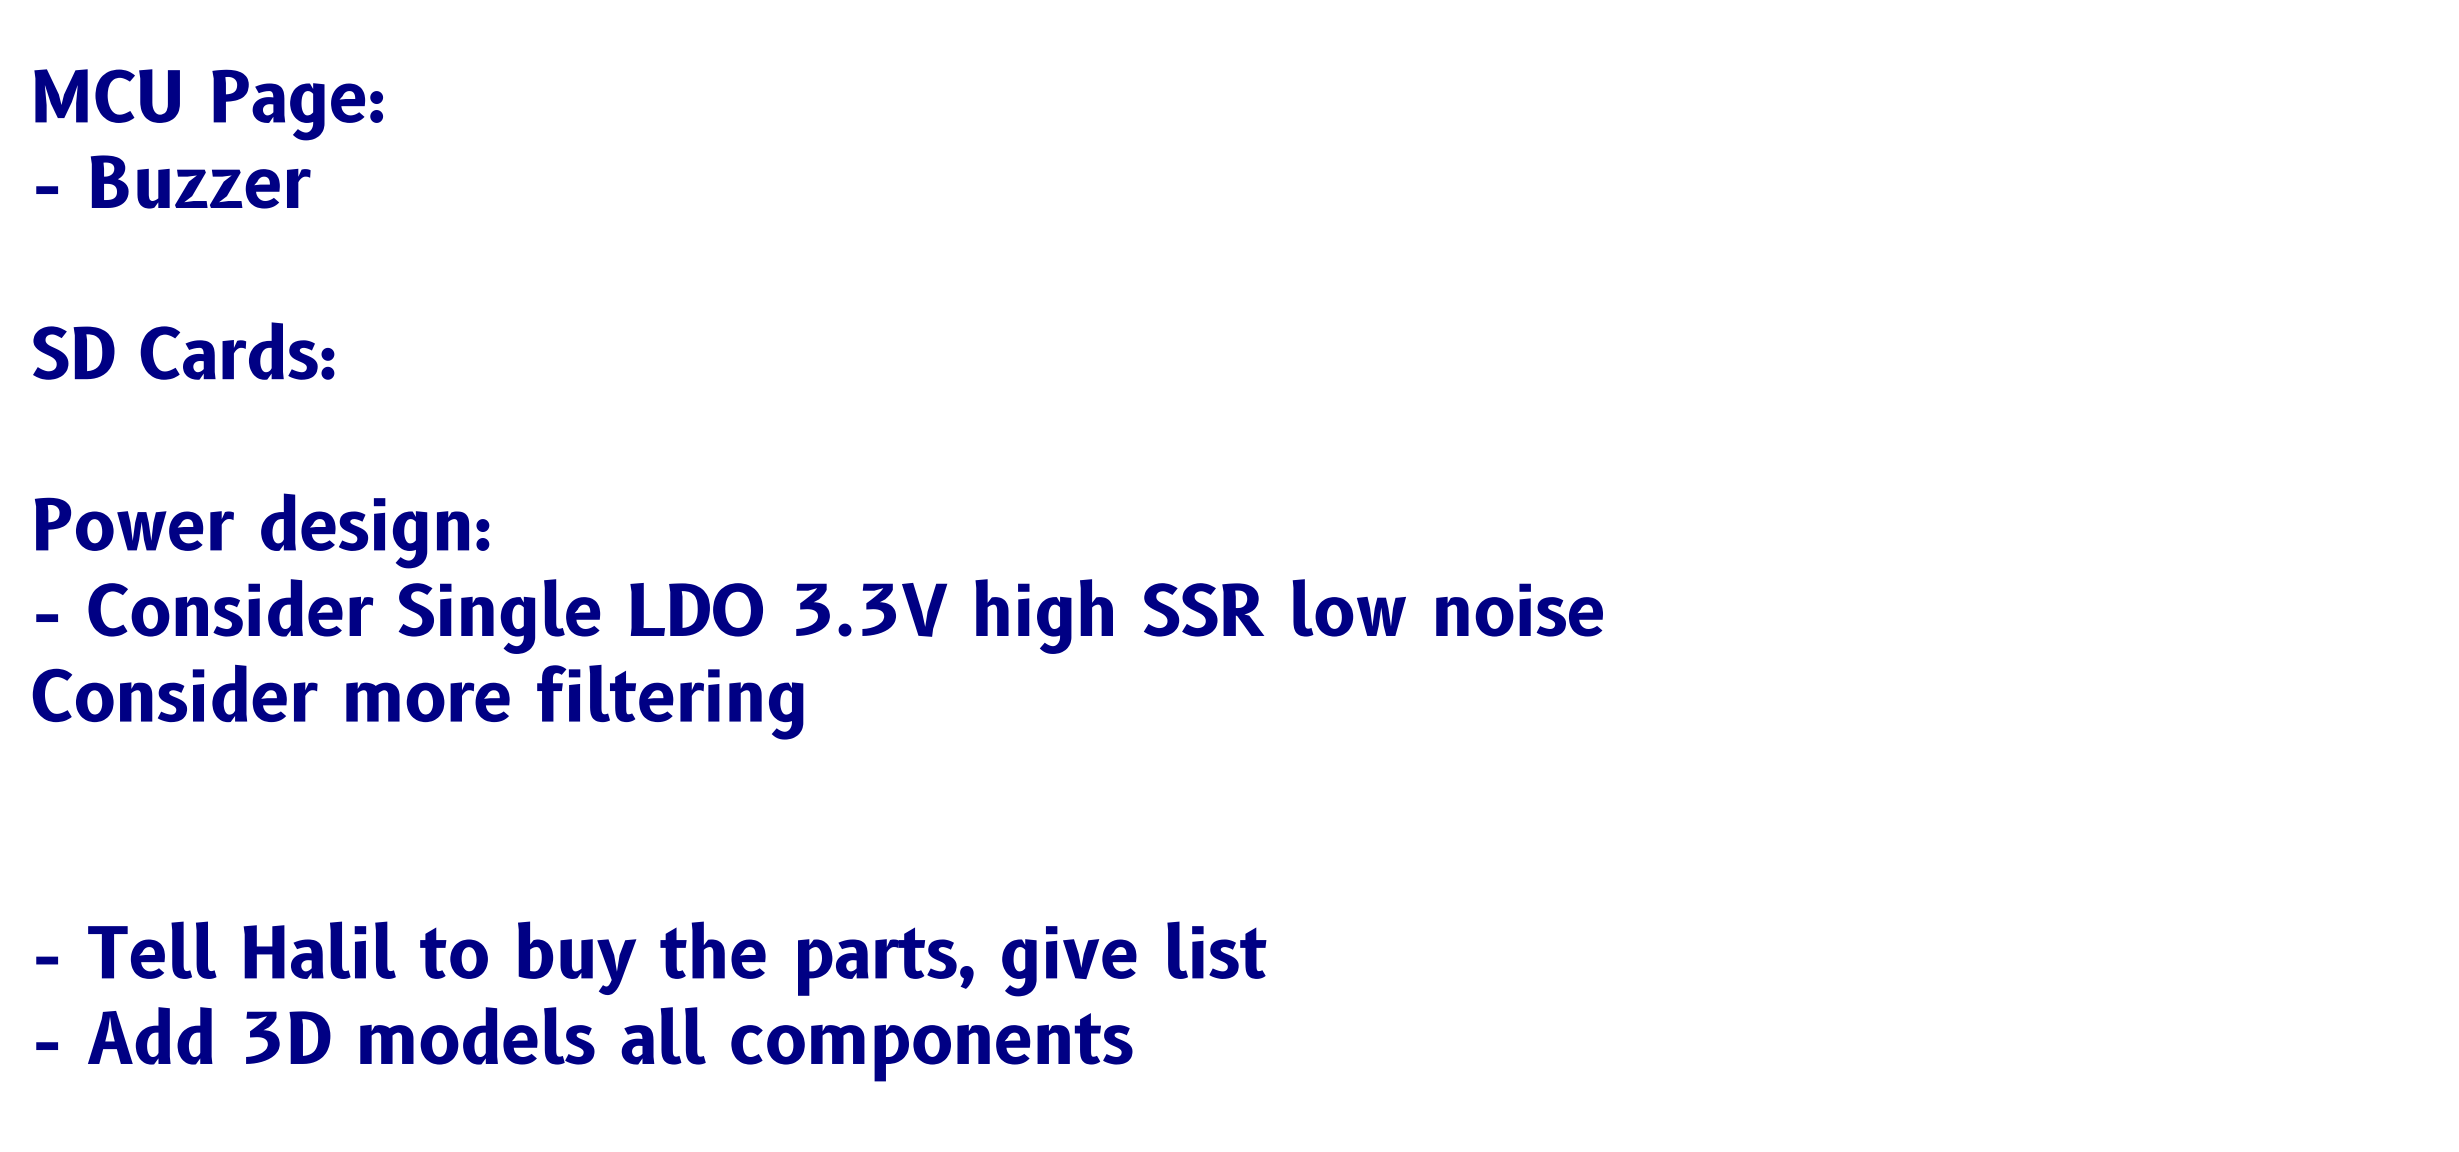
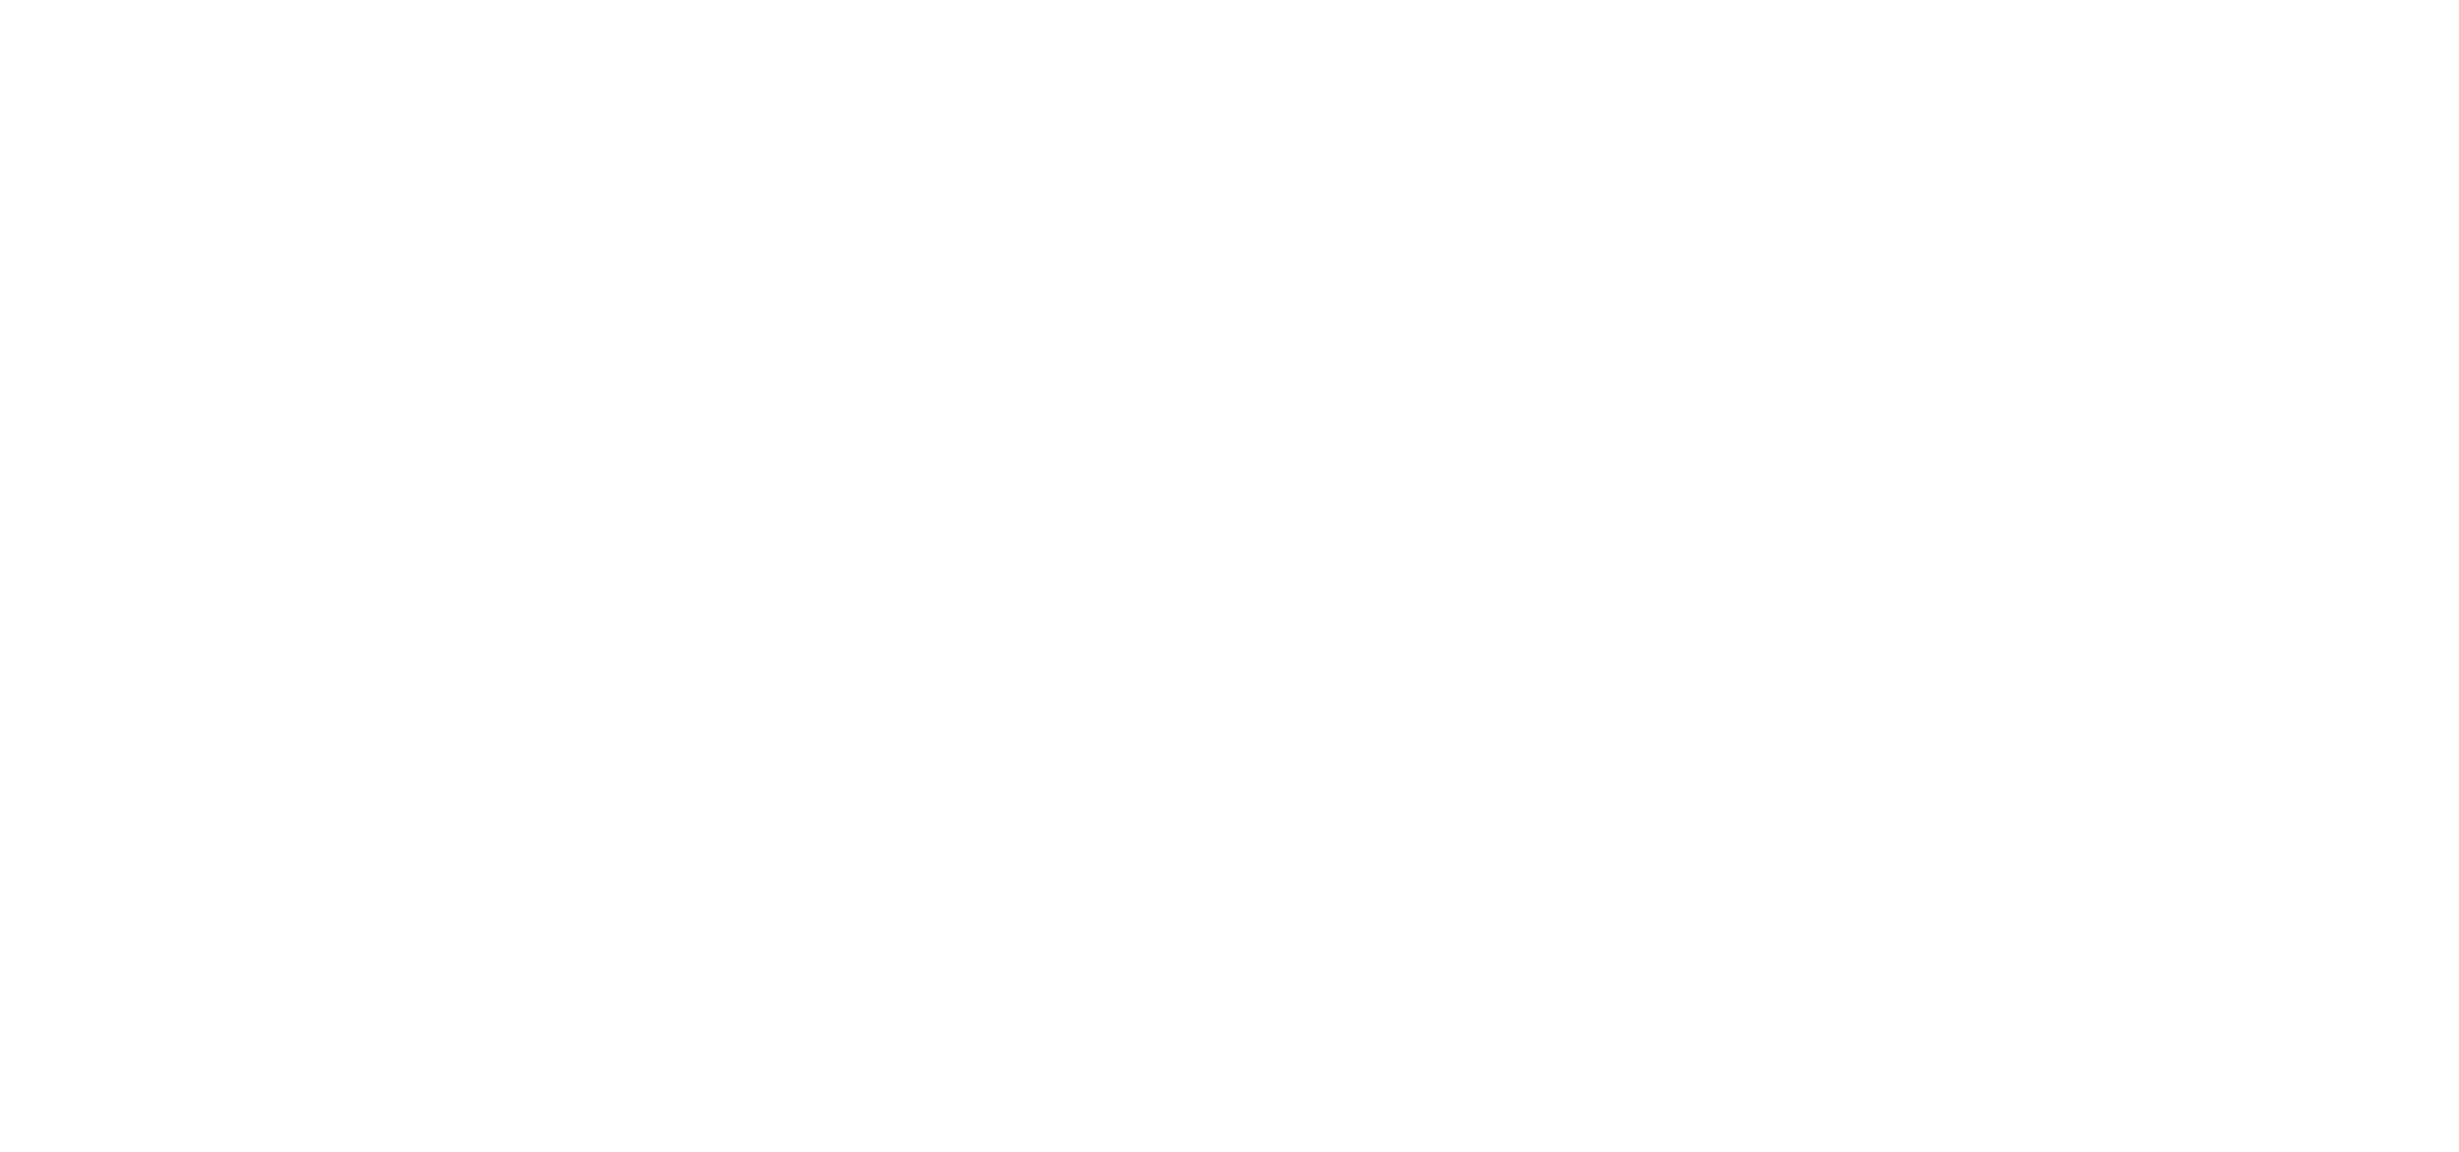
text: MCU Page: (208, 104) -> none
text: - Buzzer (173, 182) -> none
text: SD Cards: (183, 351) -> none
text: Power design: (262, 530) -> none
text: - Consider Single LDO 3.3V high SSR low noise (819, 616) -> none
text: Consider more filtering (418, 702) -> none
text: - Tell Halil to buy the parts, give list (651, 958) -> none
text: - Add 3D models all components (584, 1044) -> none

